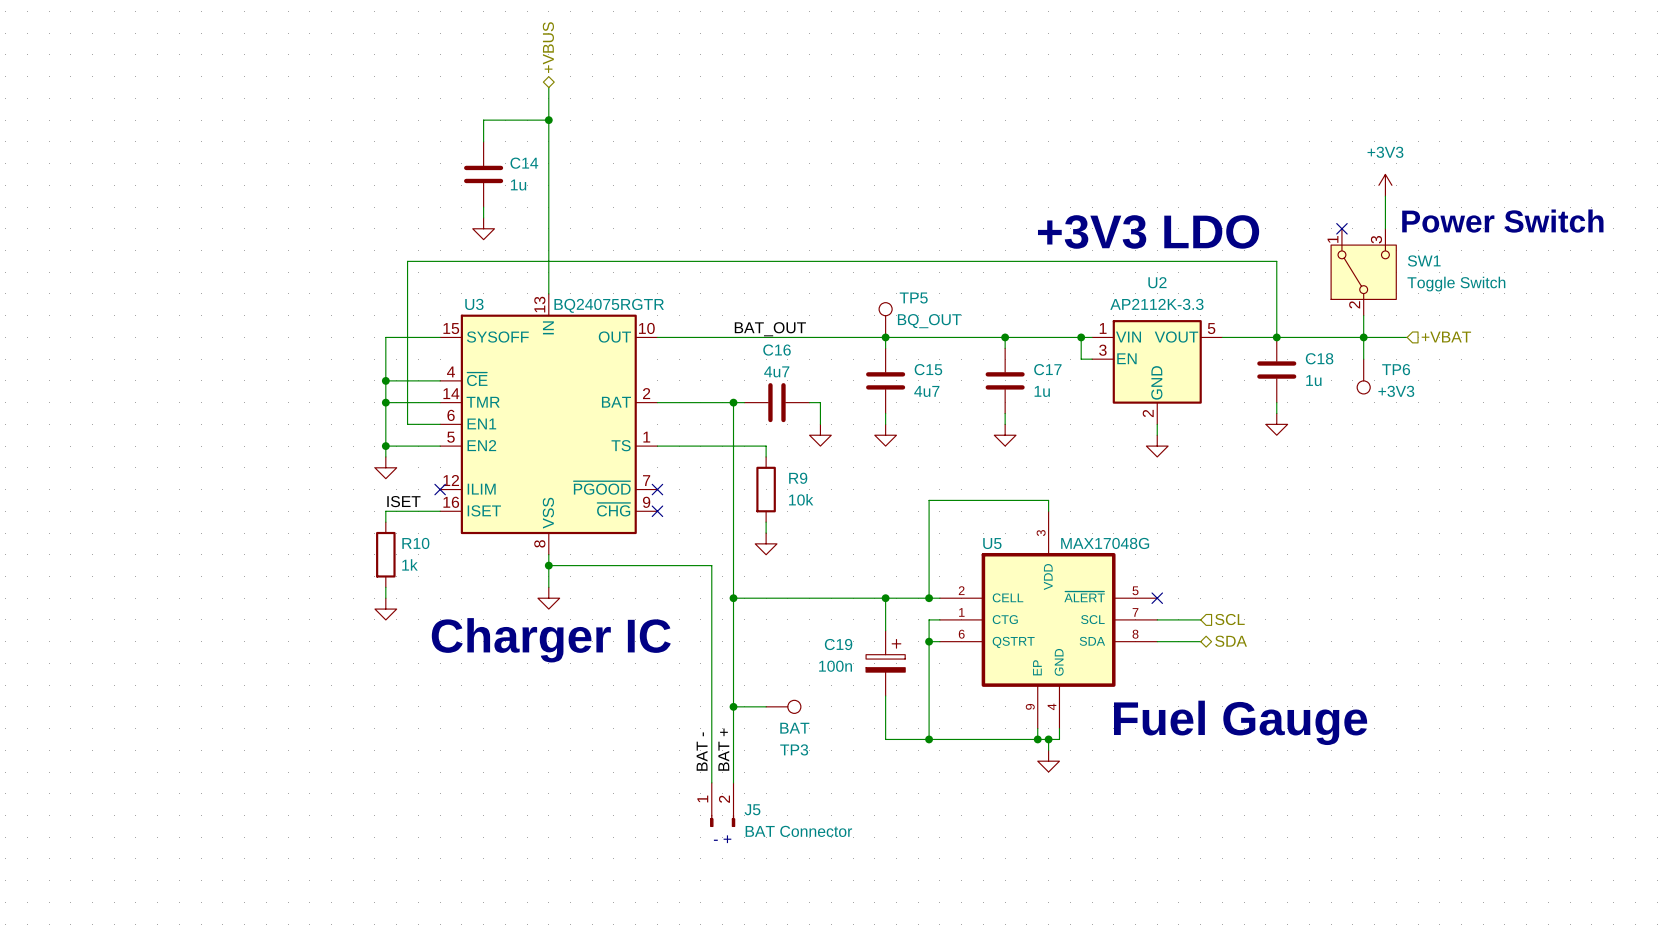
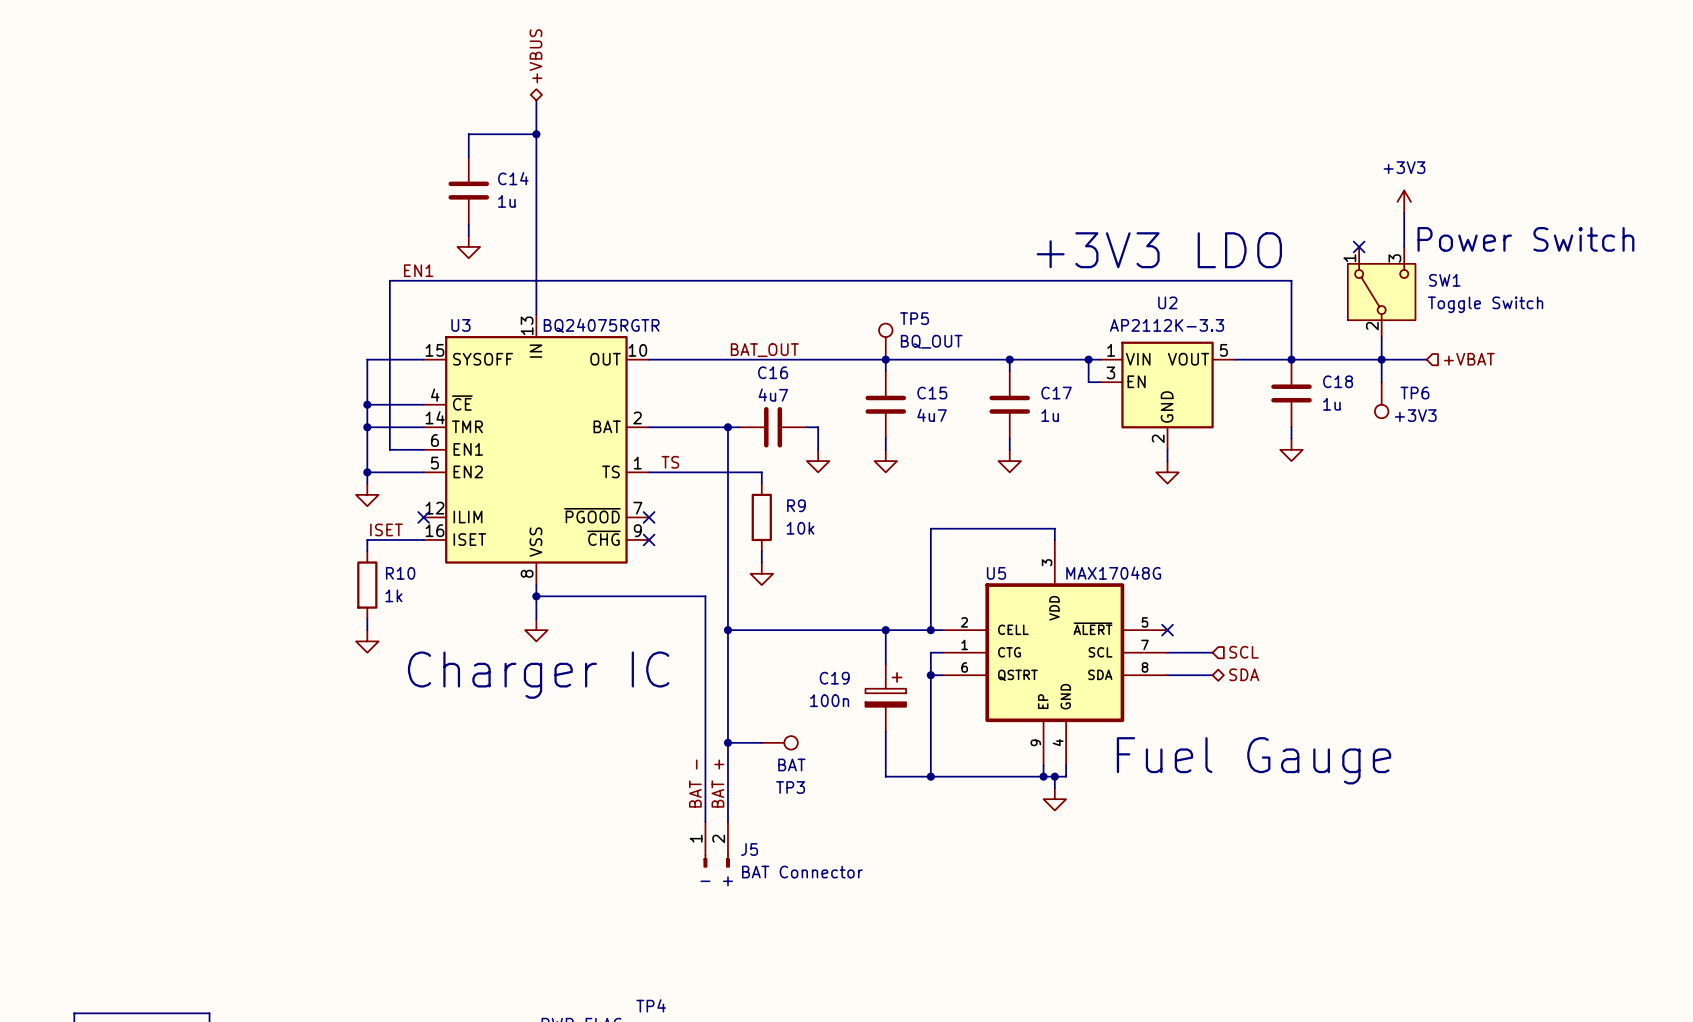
label: none -> EN1 (418, 270)
label: none -> TS (670, 462)

